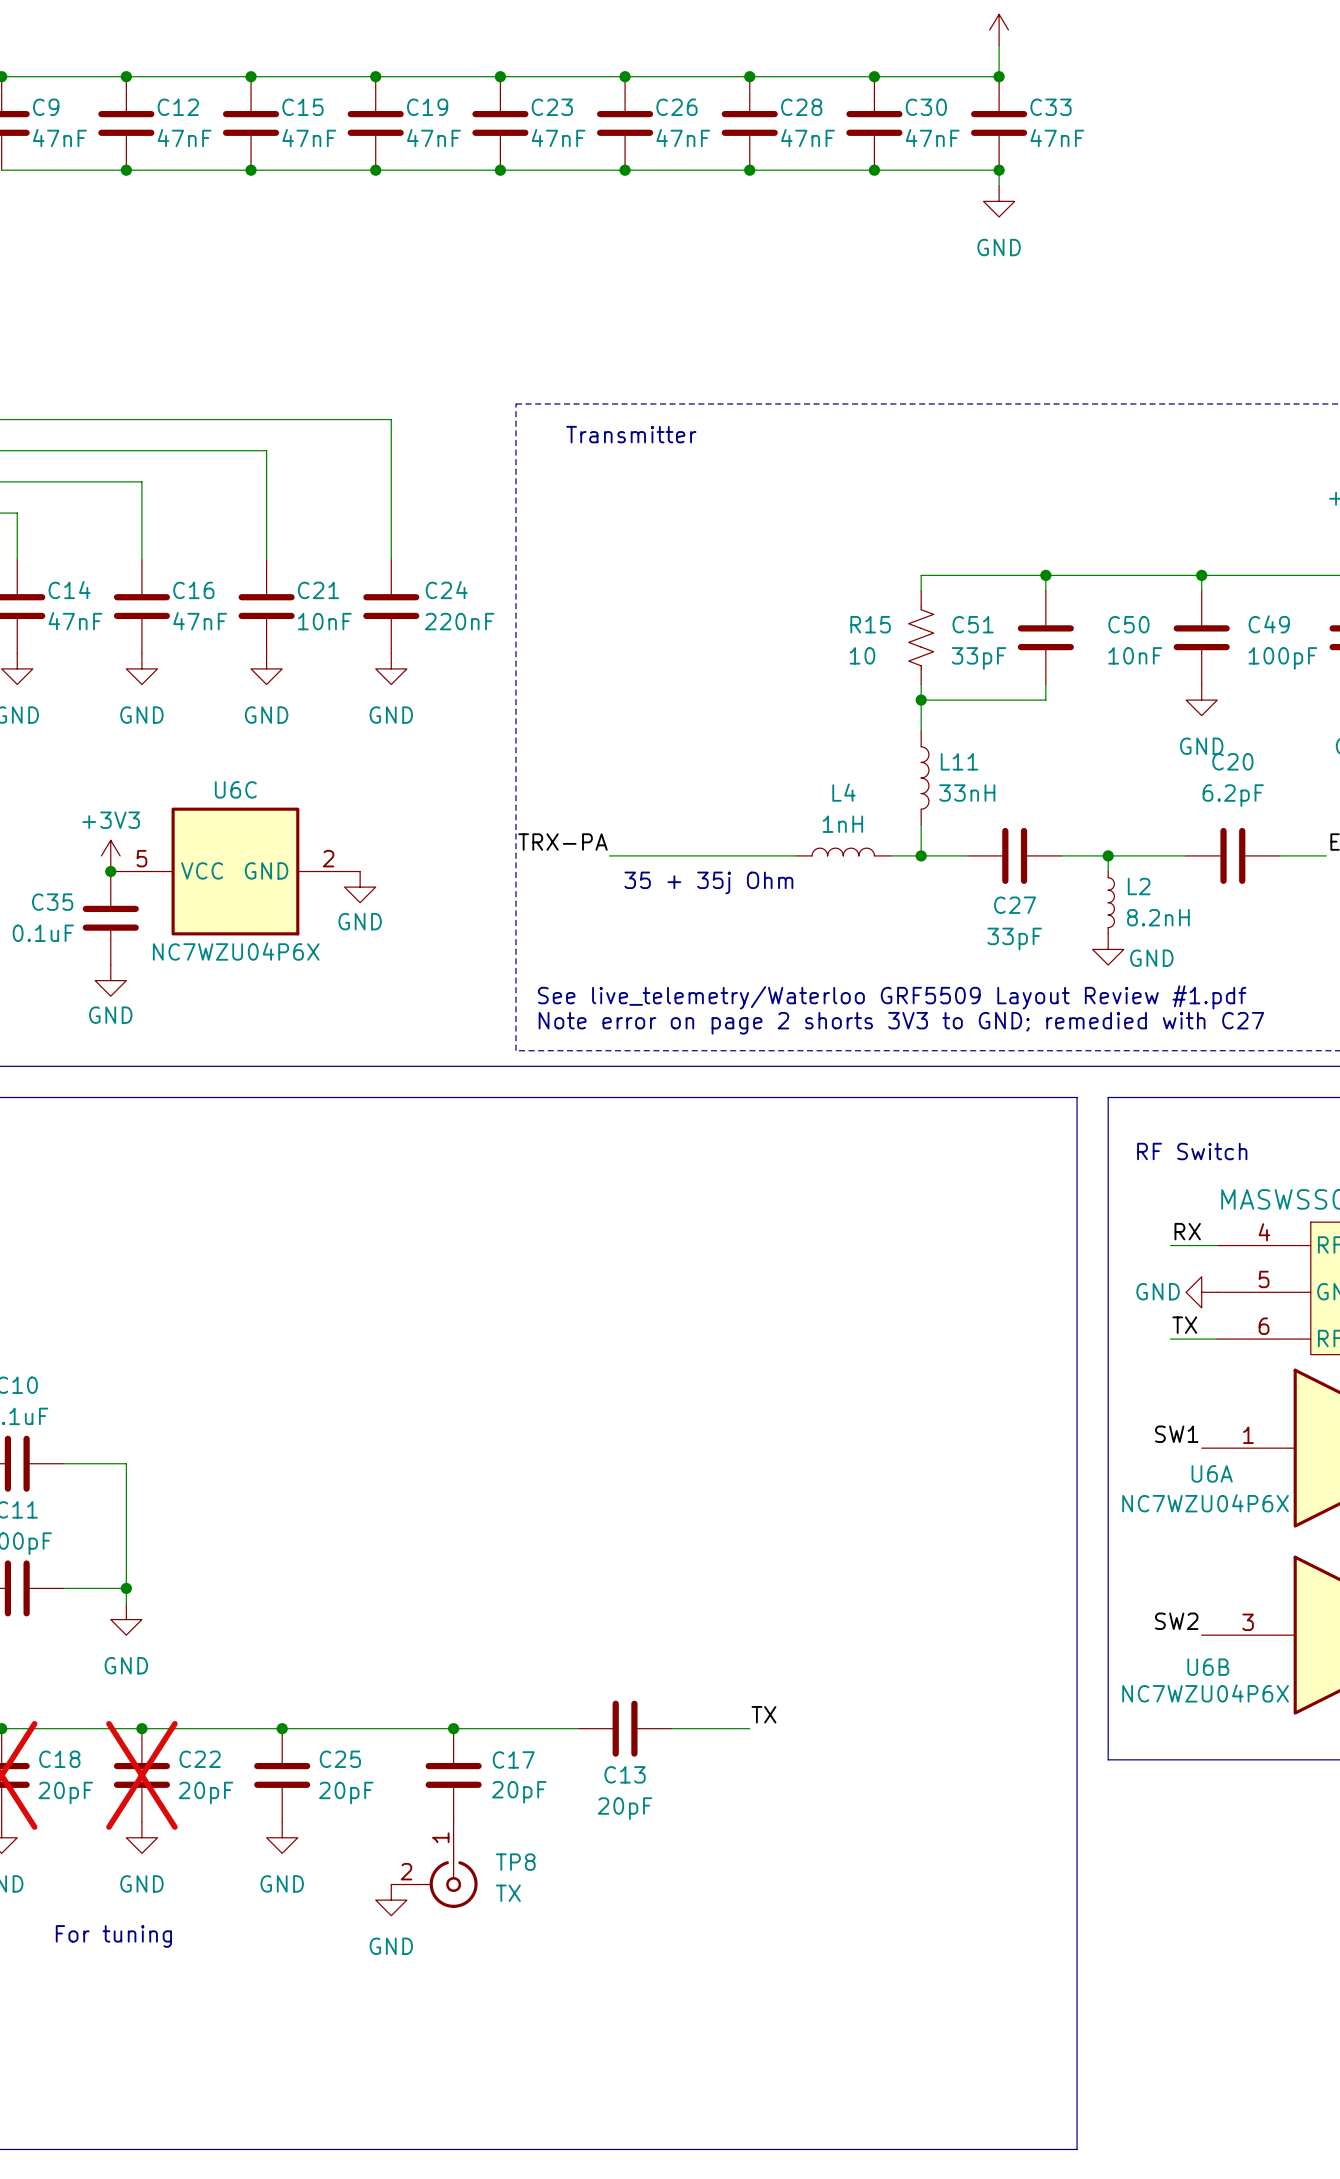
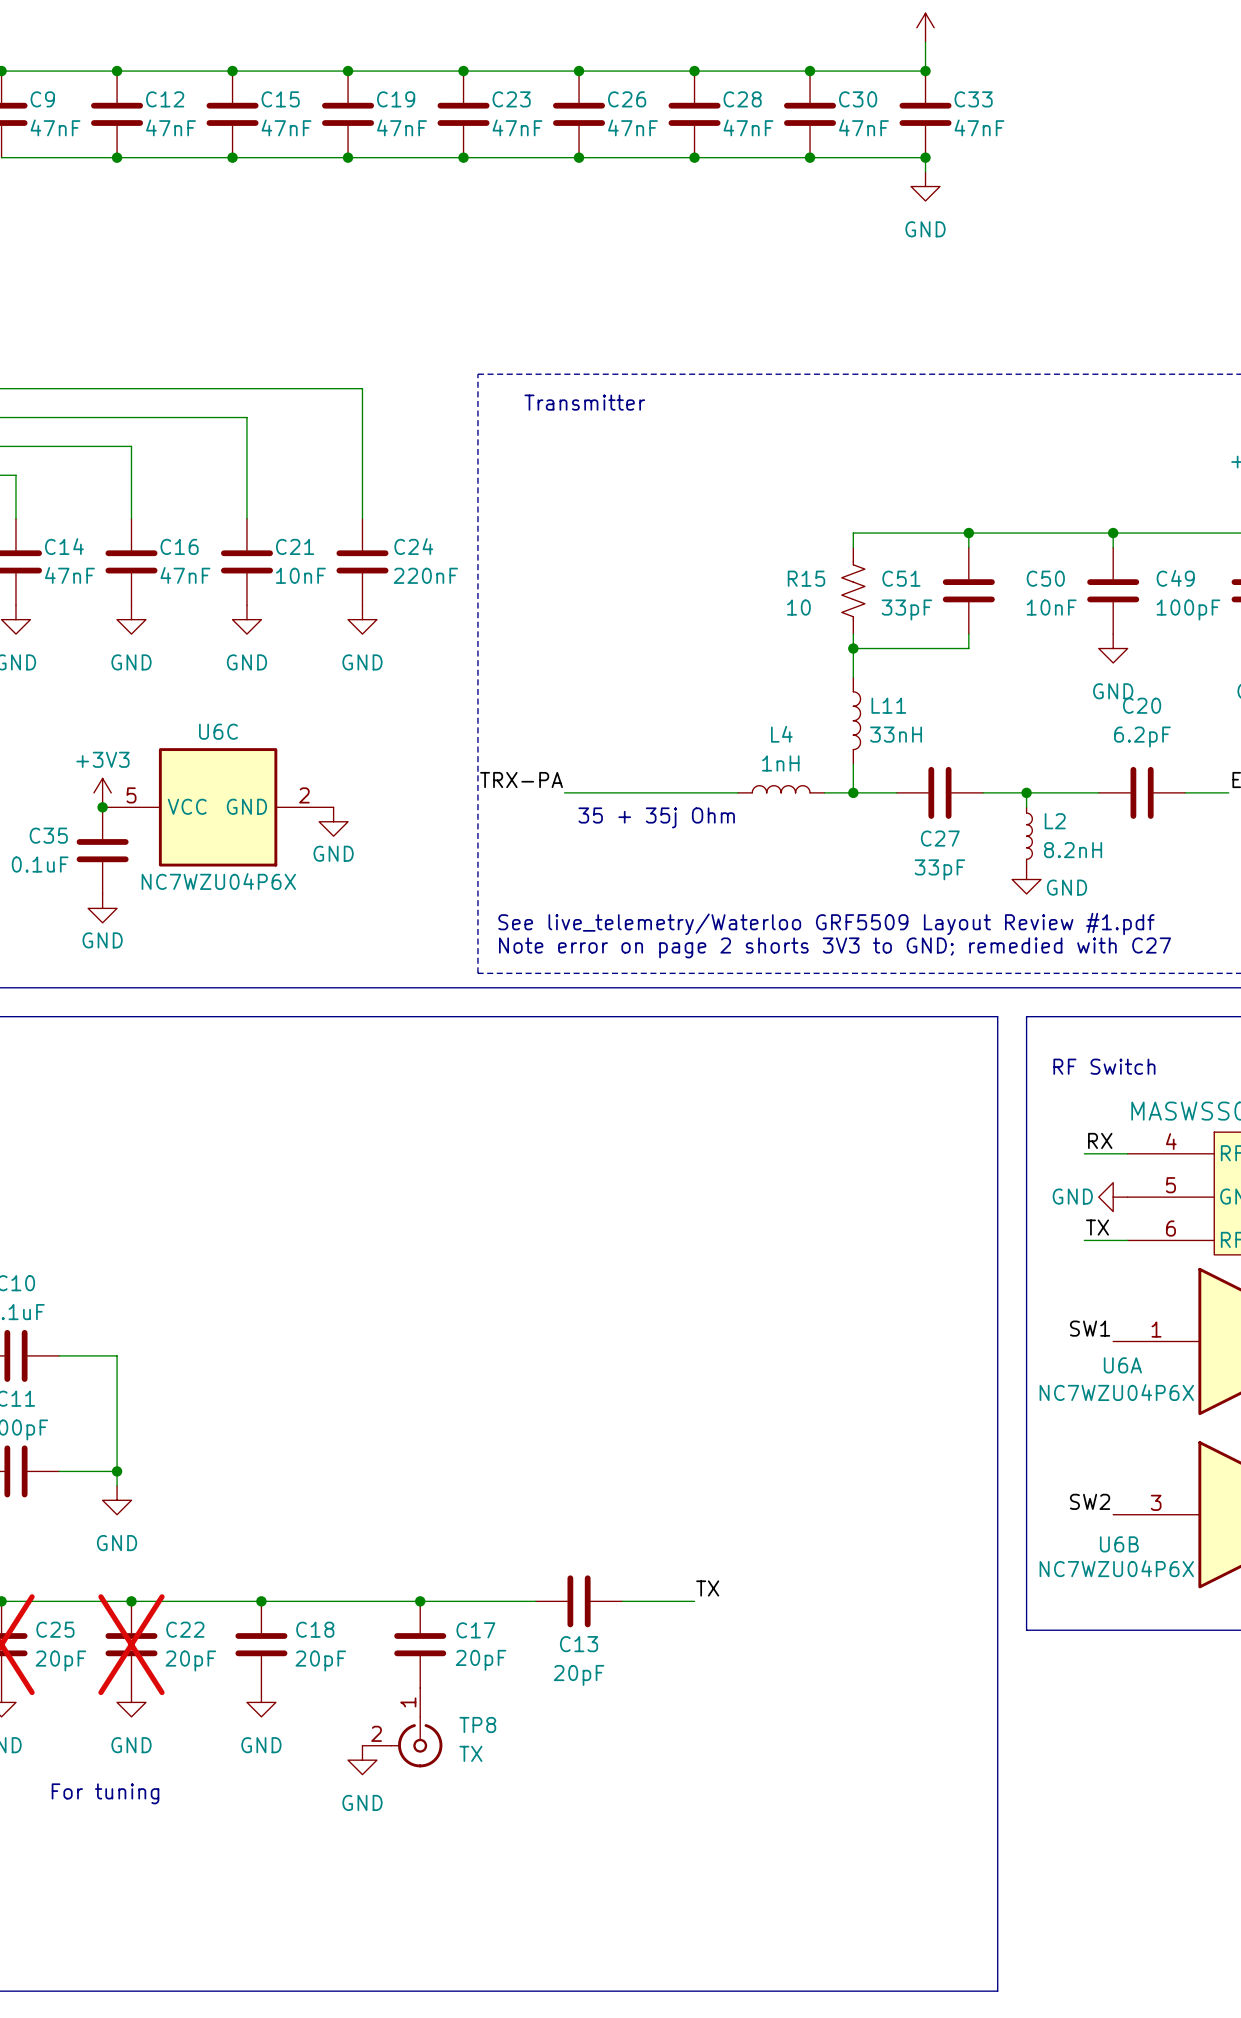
C18 name: C18 (59, 1759) -> C25 (55, 1629)
C25 name: C25 (340, 1759) -> C18 (315, 1629)

